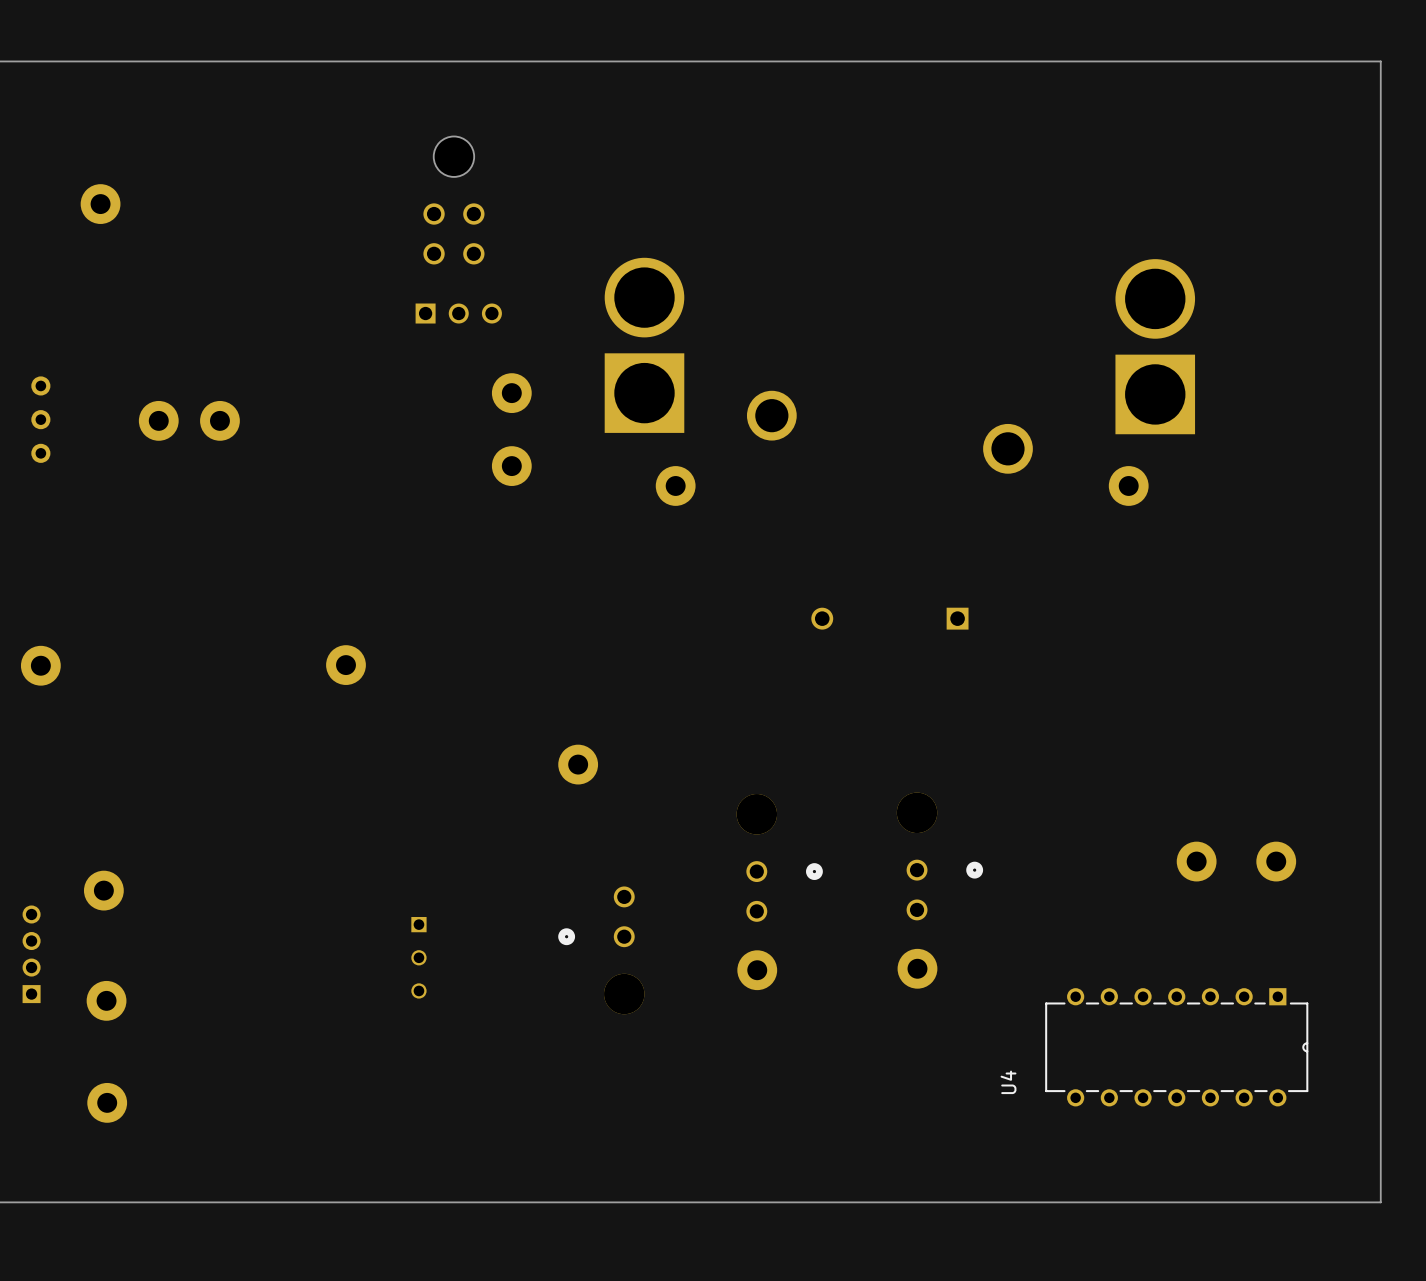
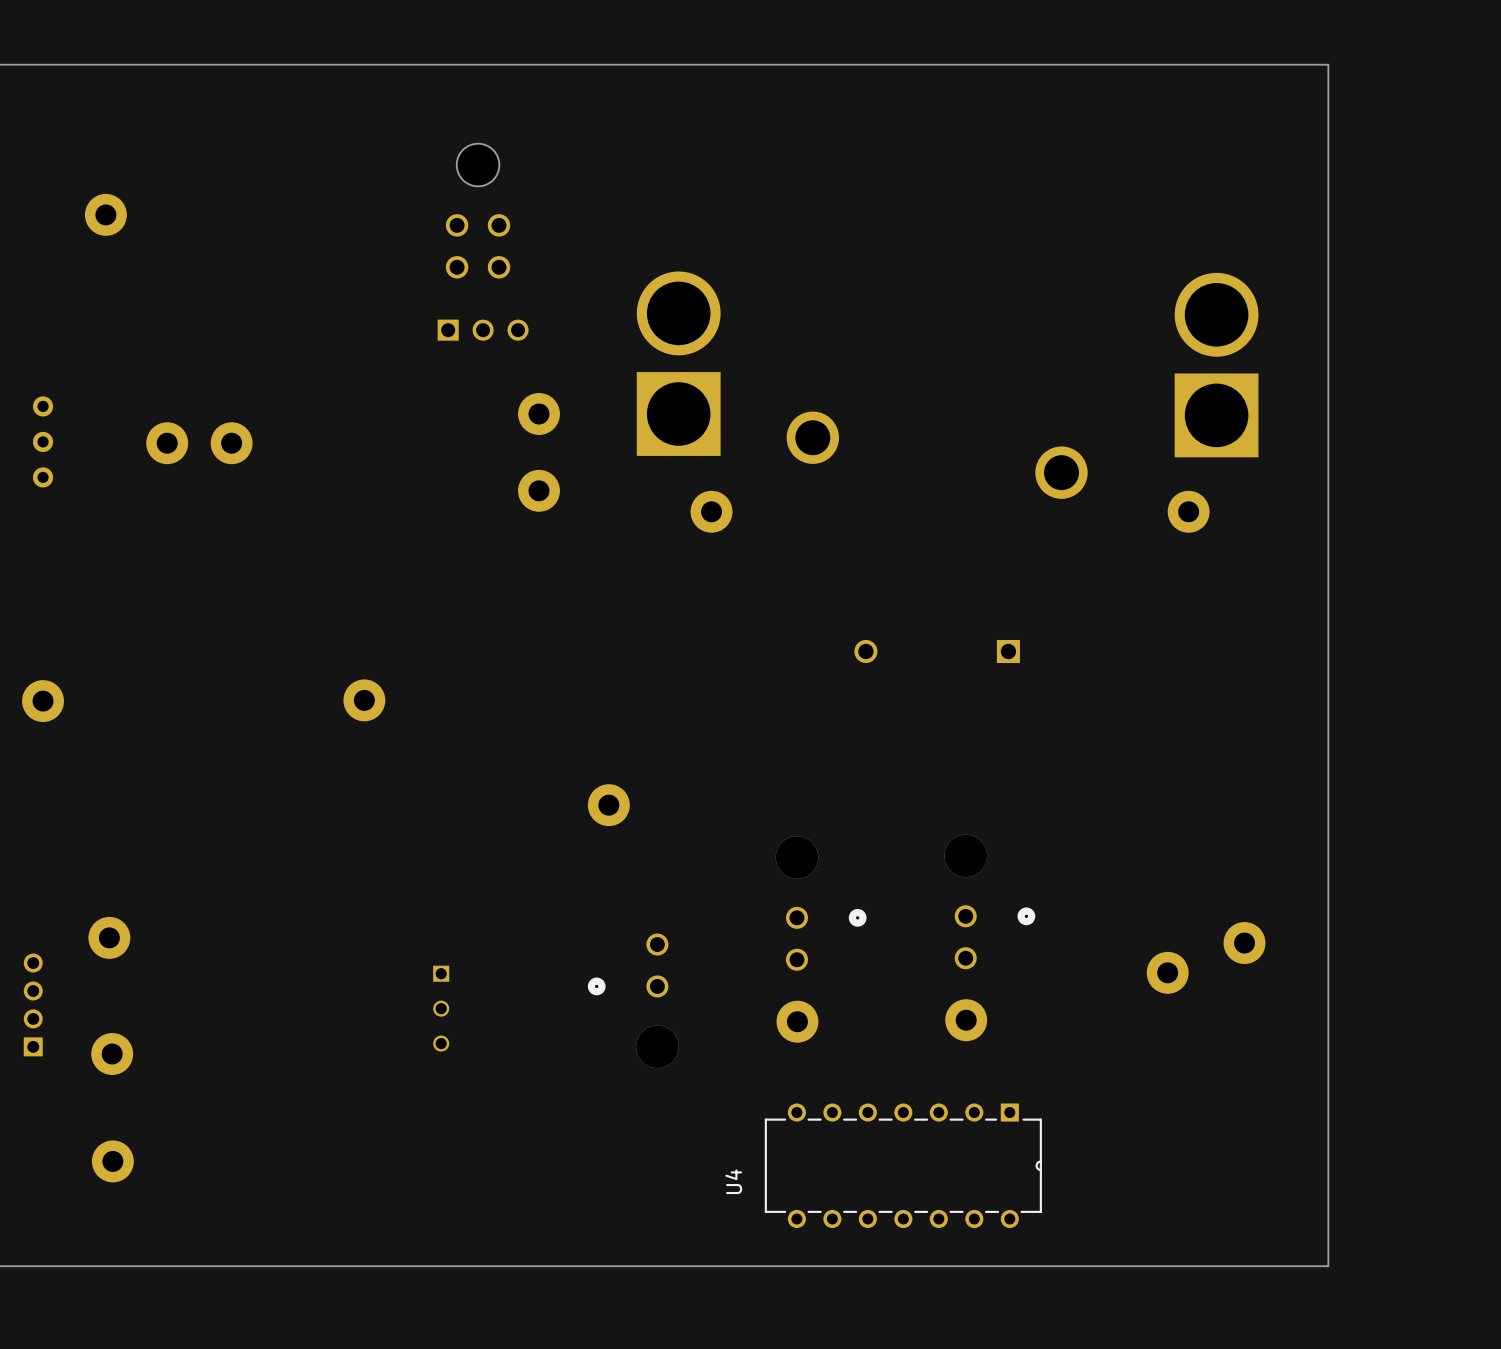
board edge: (1261, 61) (1380, 61) (1380, 1202) (1261, 1202) -> (1328, 64) (1328, 1266)
part position: (1196, 861) -> (1244, 943)
part: (1276, 861) -> none
part: none -> (1167, 972)
U4 position: (1176, 1047) -> (903, 1165)
U4 name position: U4 (1008, 1082) -> U4 (733, 1181)

